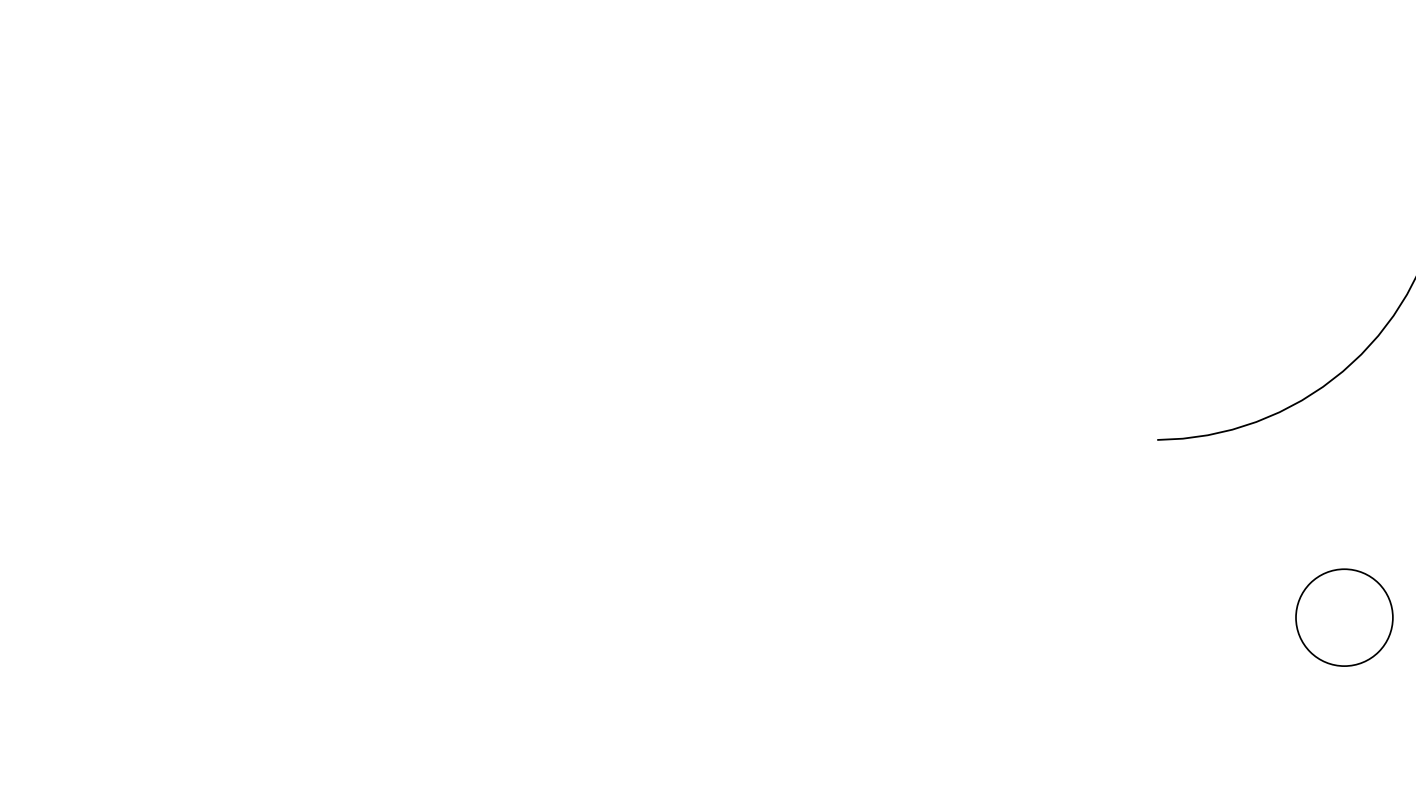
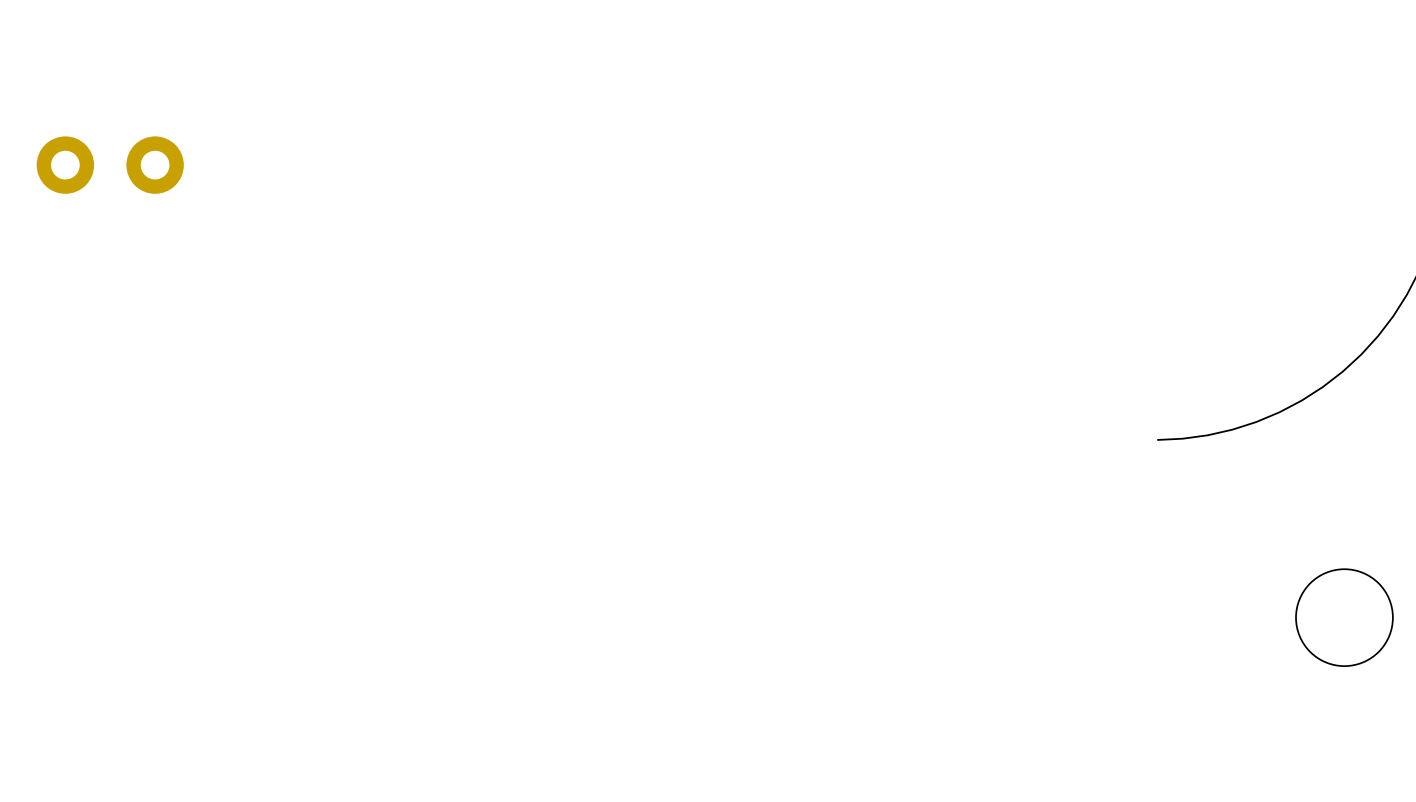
part: none -> (110, 165)

